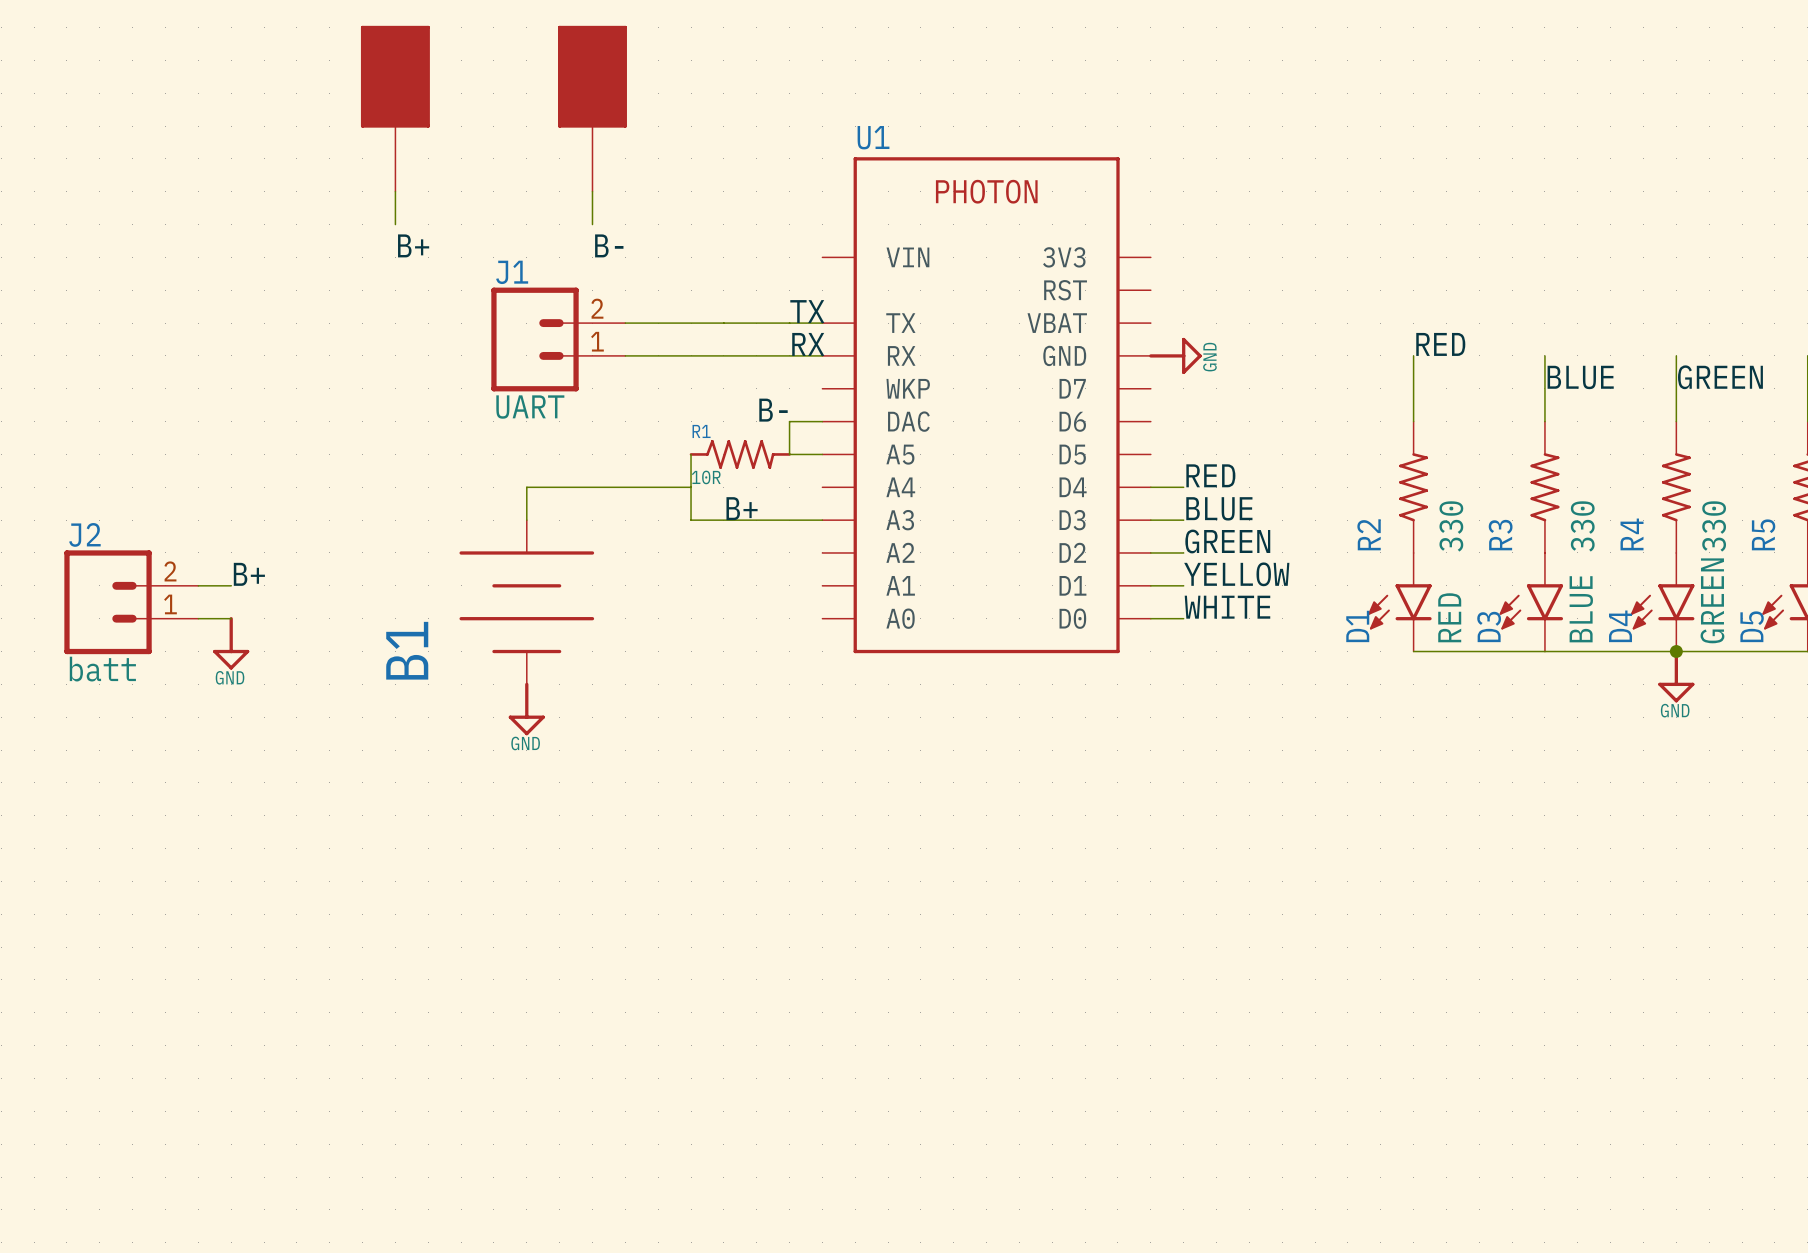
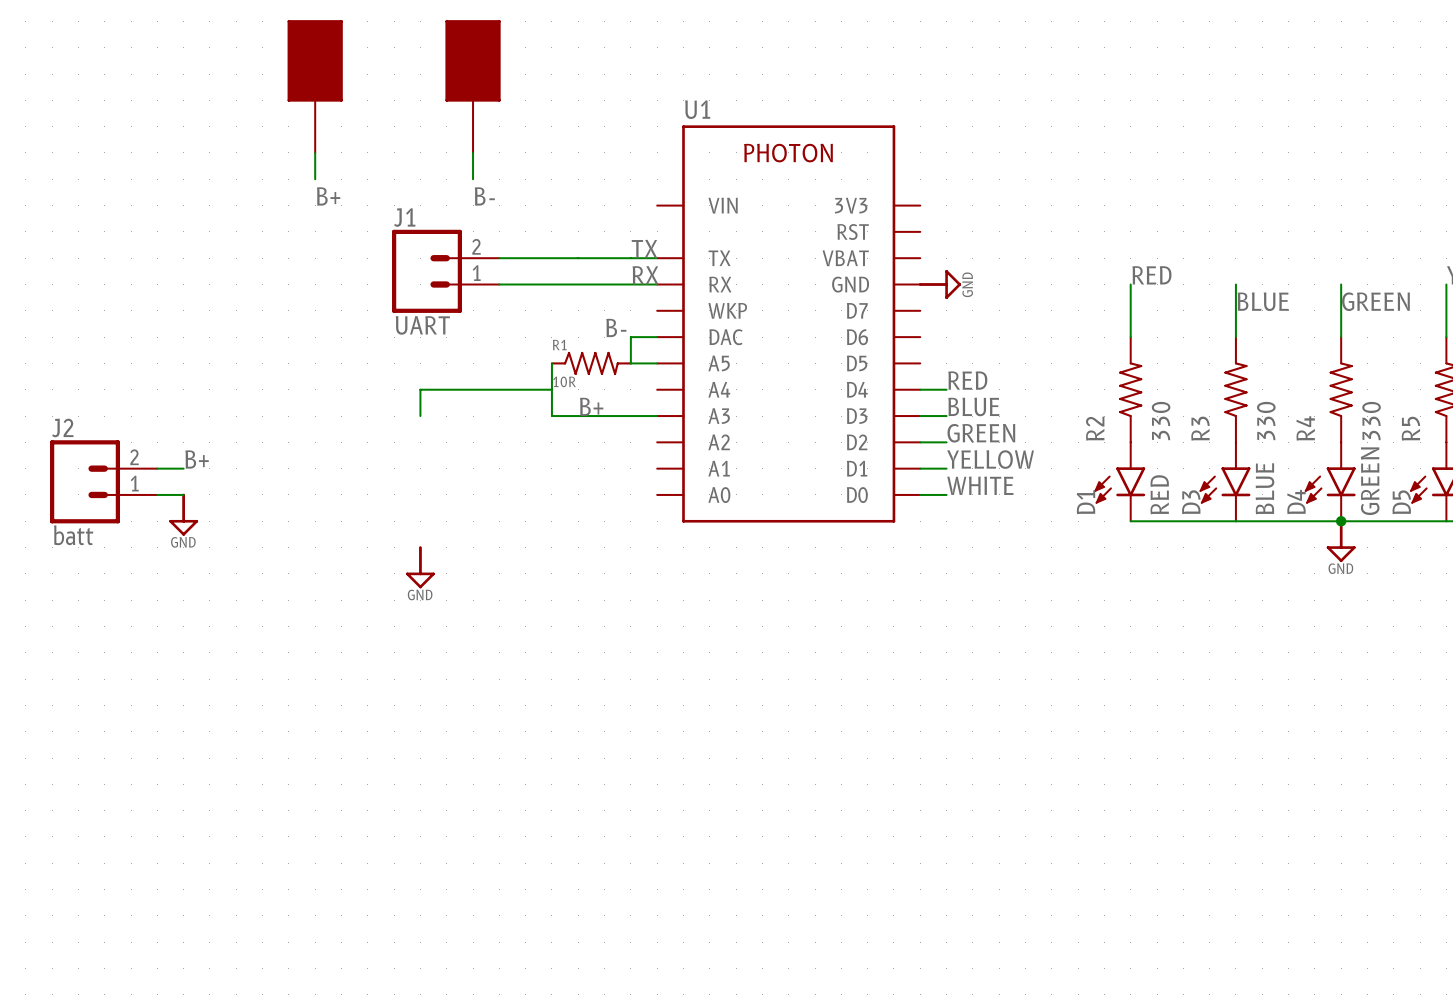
B1: (526, 602) -> none

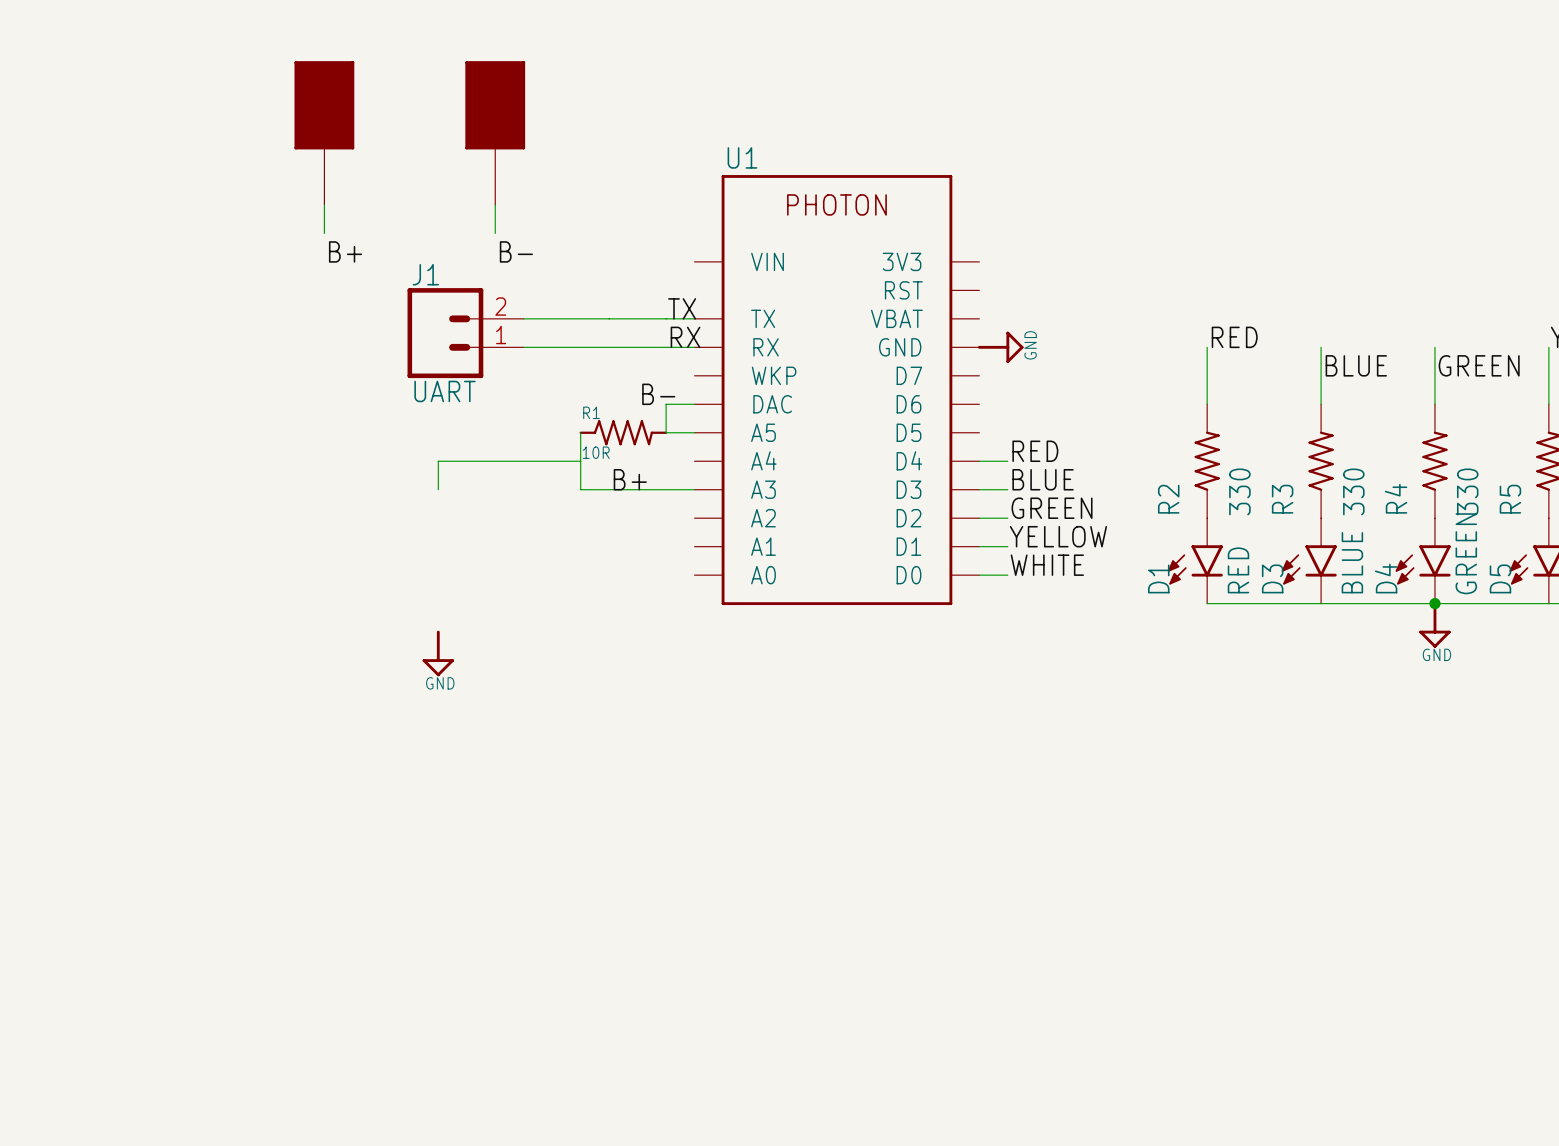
label: B+ (197, 459) -> none
wire: (157, 468) (183, 468) -> none
J2: batt (103, 481) -> none
wire: (157, 494) (183, 494) -> none
power symbol: GND (183, 514) -> none

